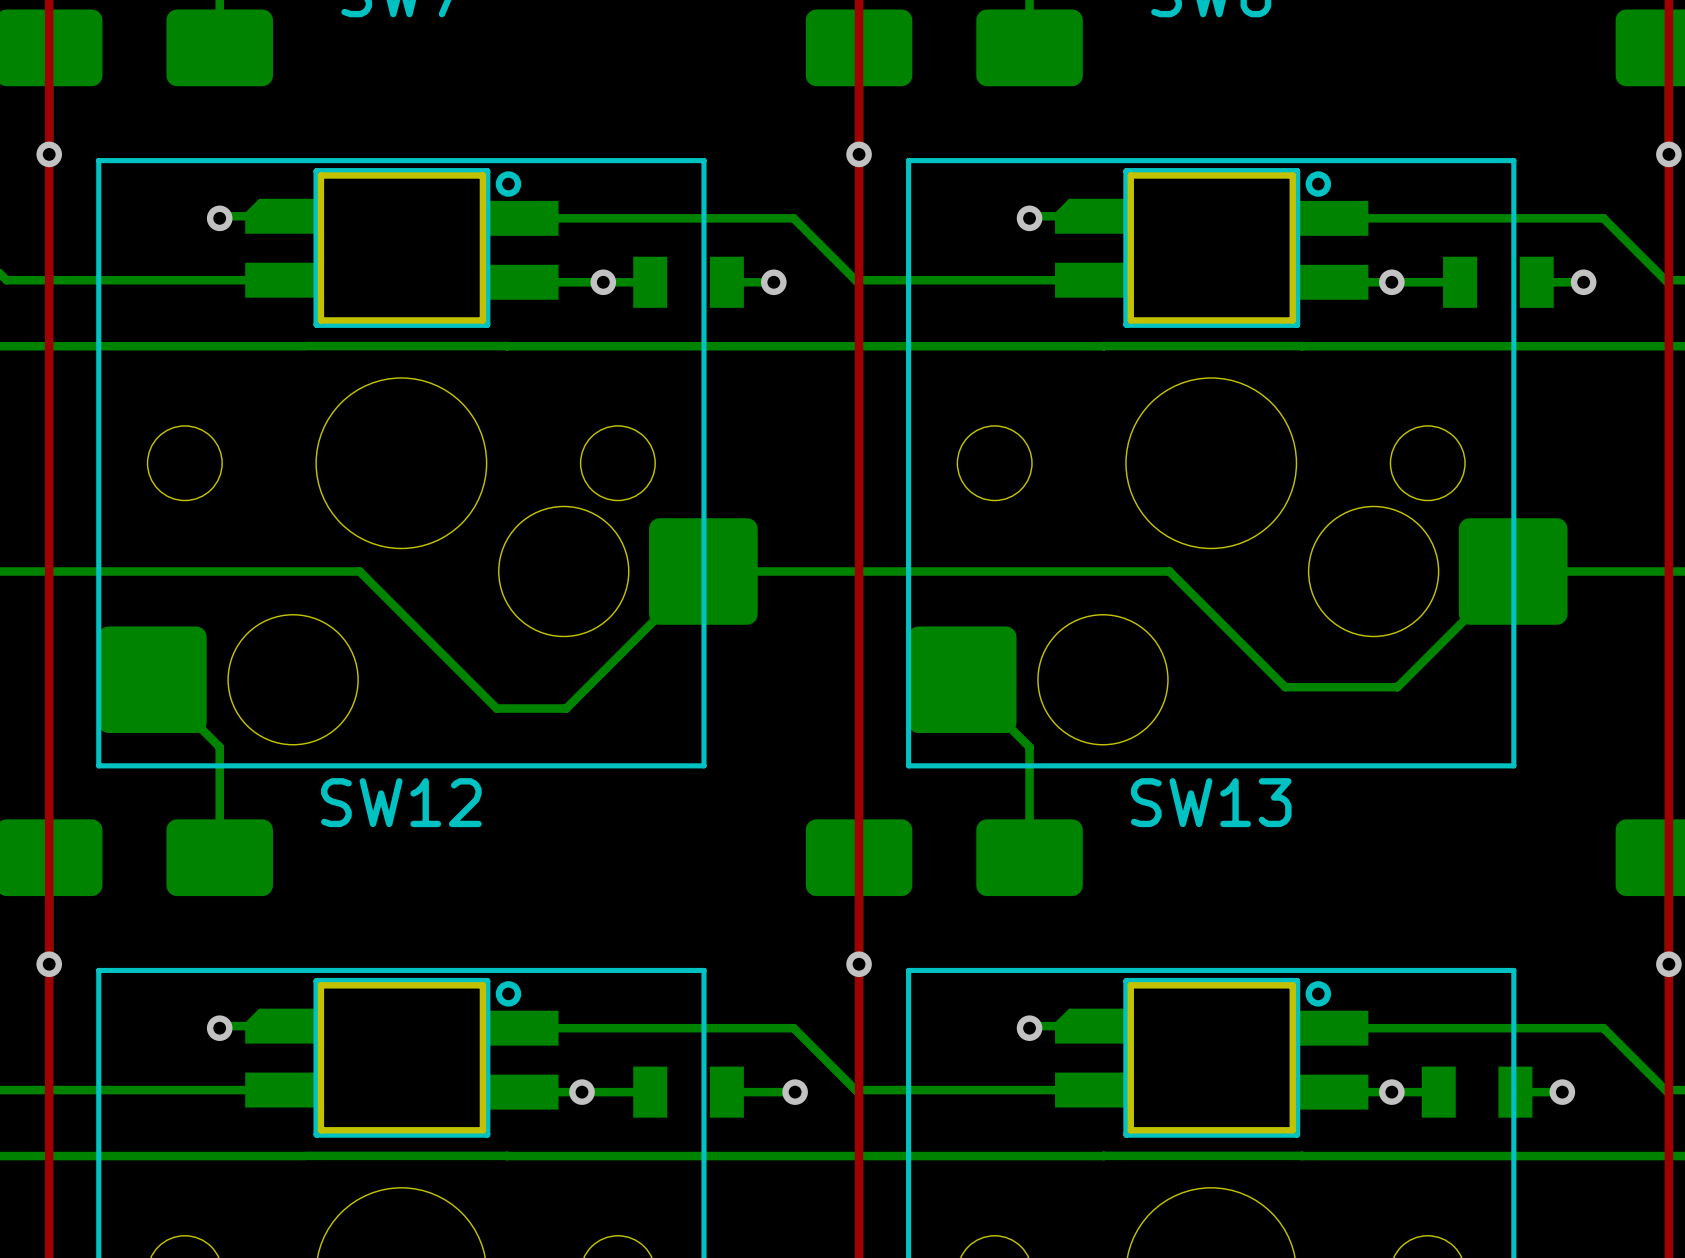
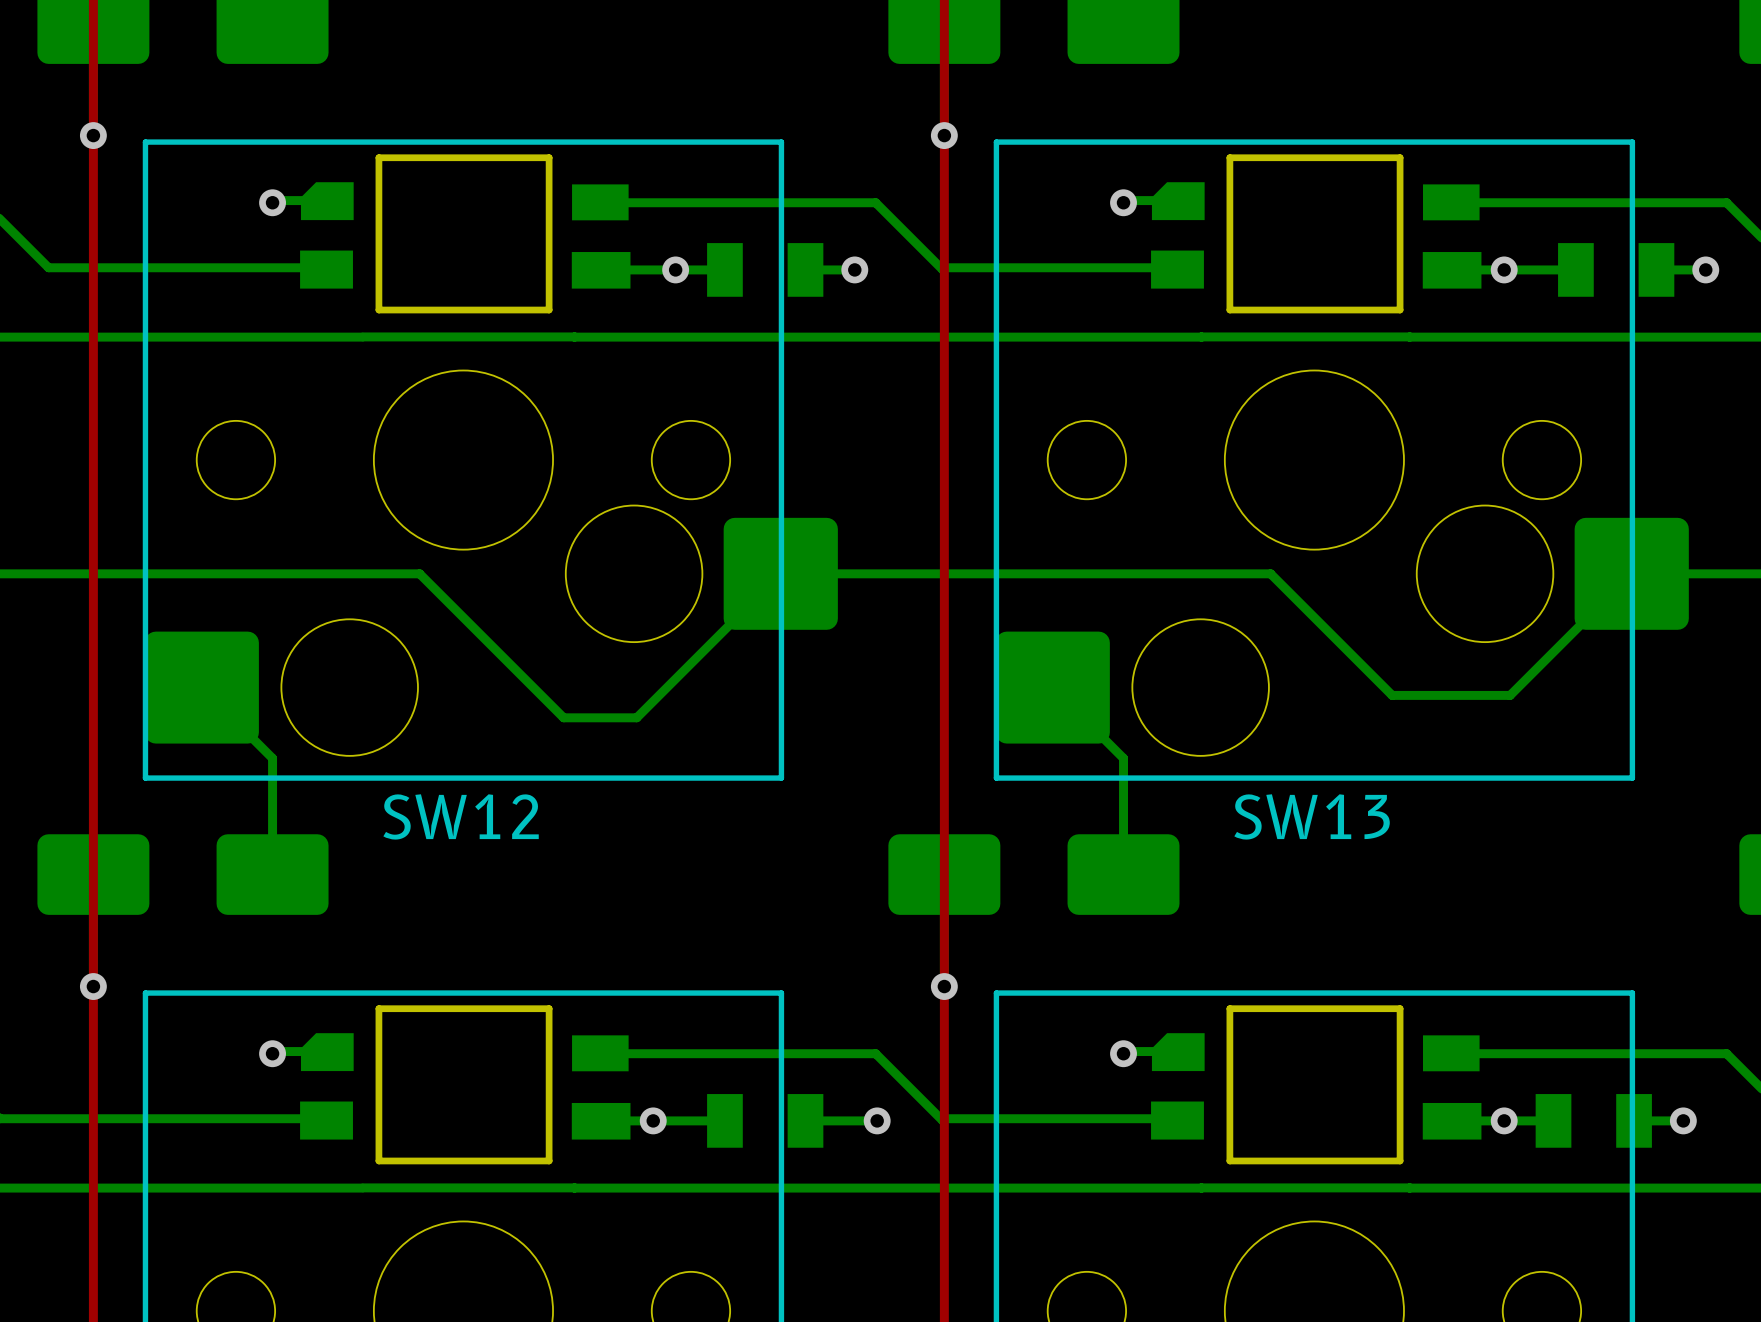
part footprint: [245, 168, 559, 328] -> [300, 154, 631, 314]
part footprint: [1055, 168, 1369, 328] -> [1151, 154, 1482, 314]
part footprint: [245, 977, 559, 1138] -> [300, 1005, 631, 1165]
part footprint: [1055, 977, 1369, 1138] -> [1151, 1005, 1482, 1165]

